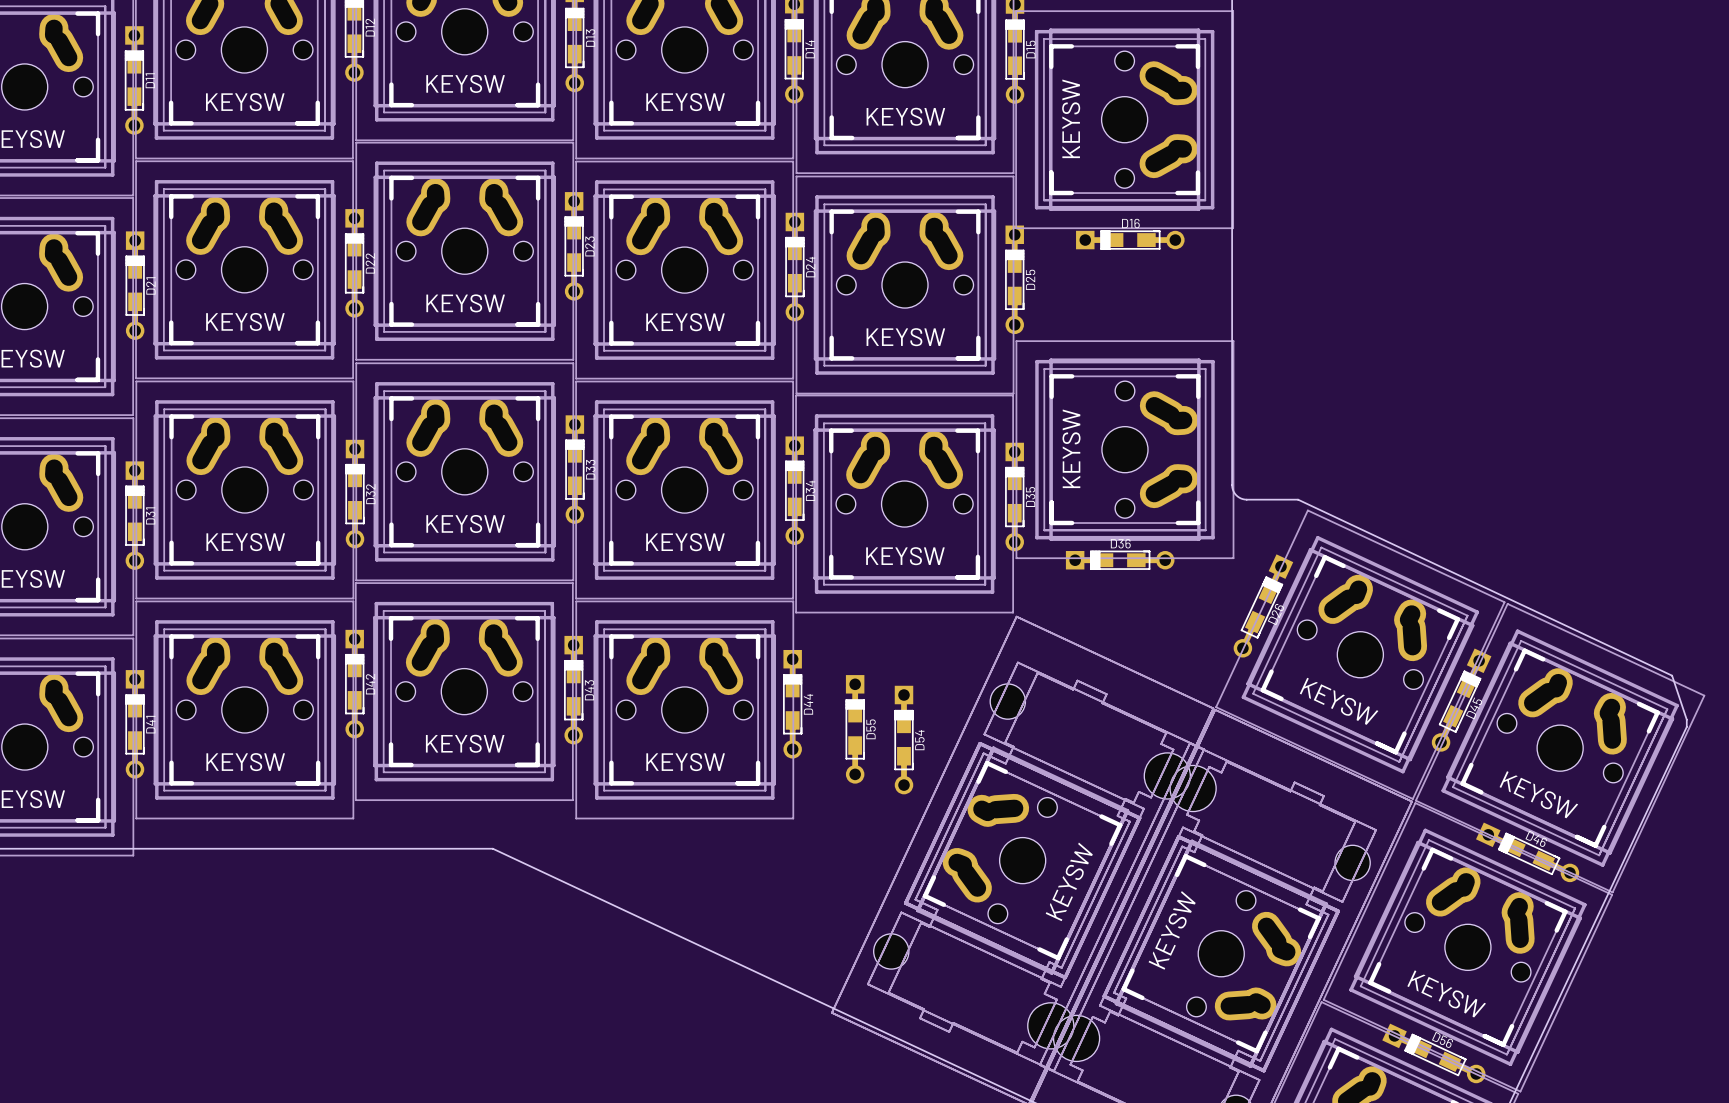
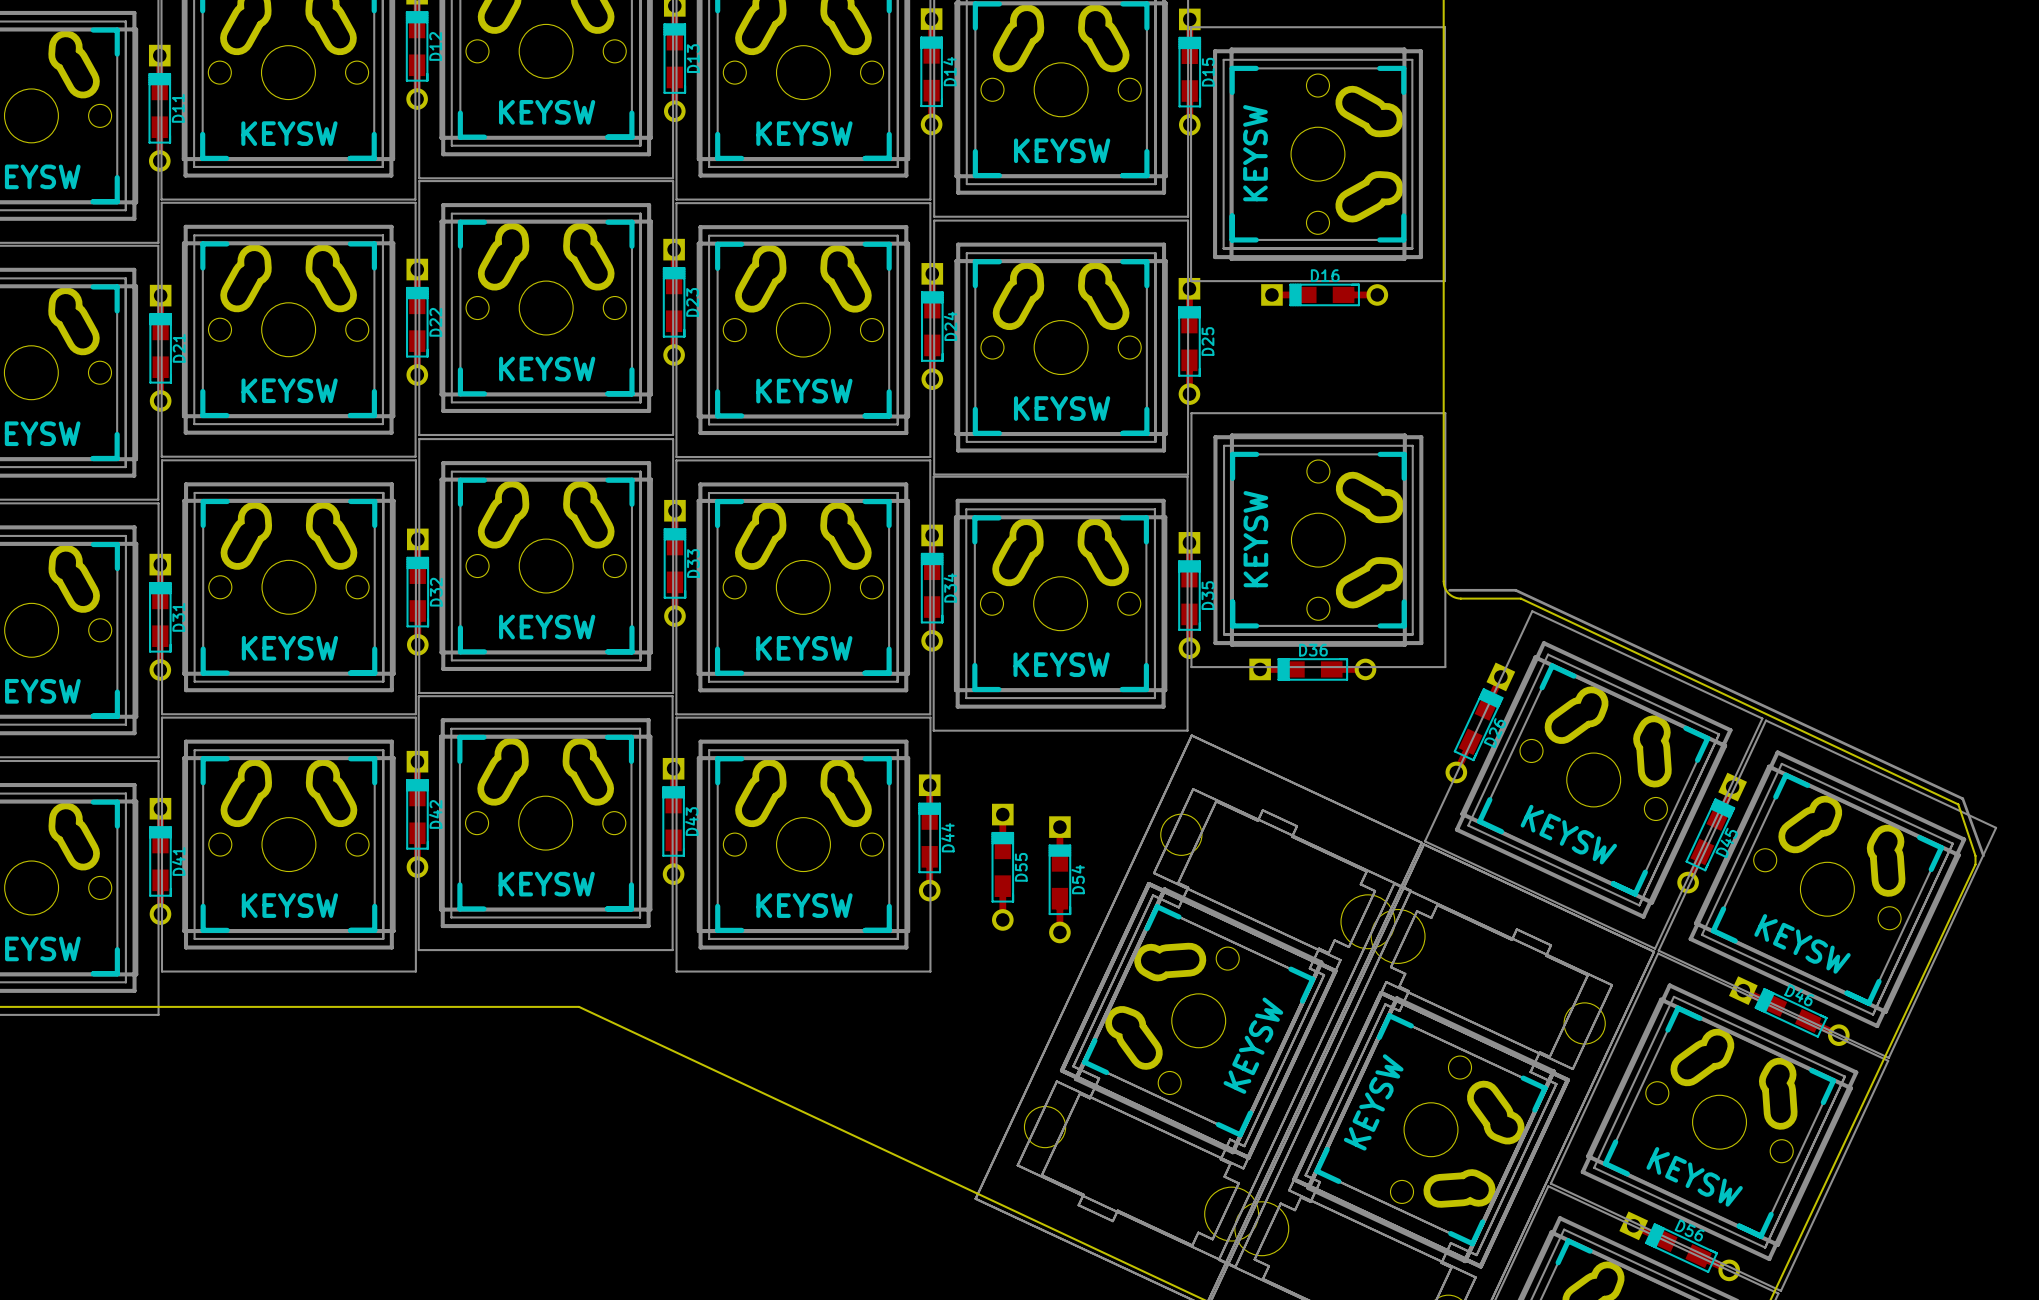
line: none -> (1449, 590) (1515, 590) (1962, 798) (1983, 855)

